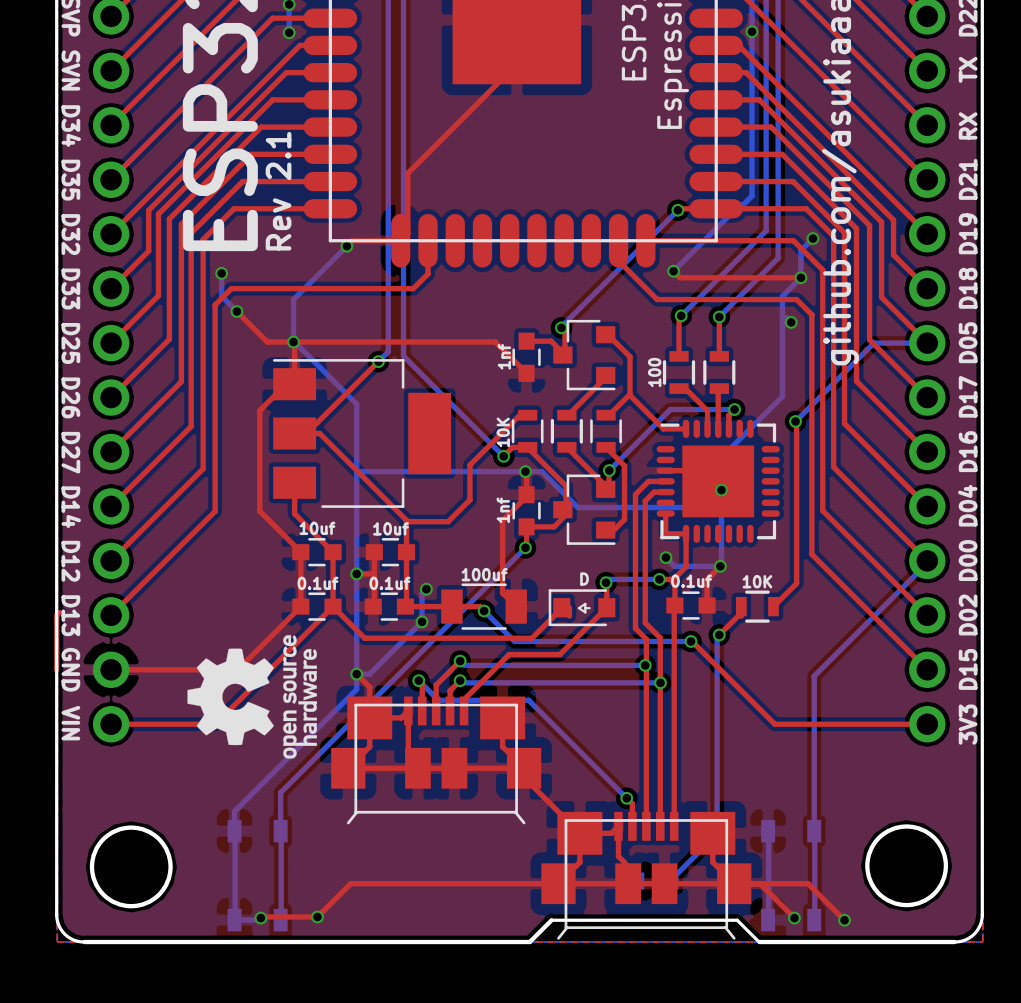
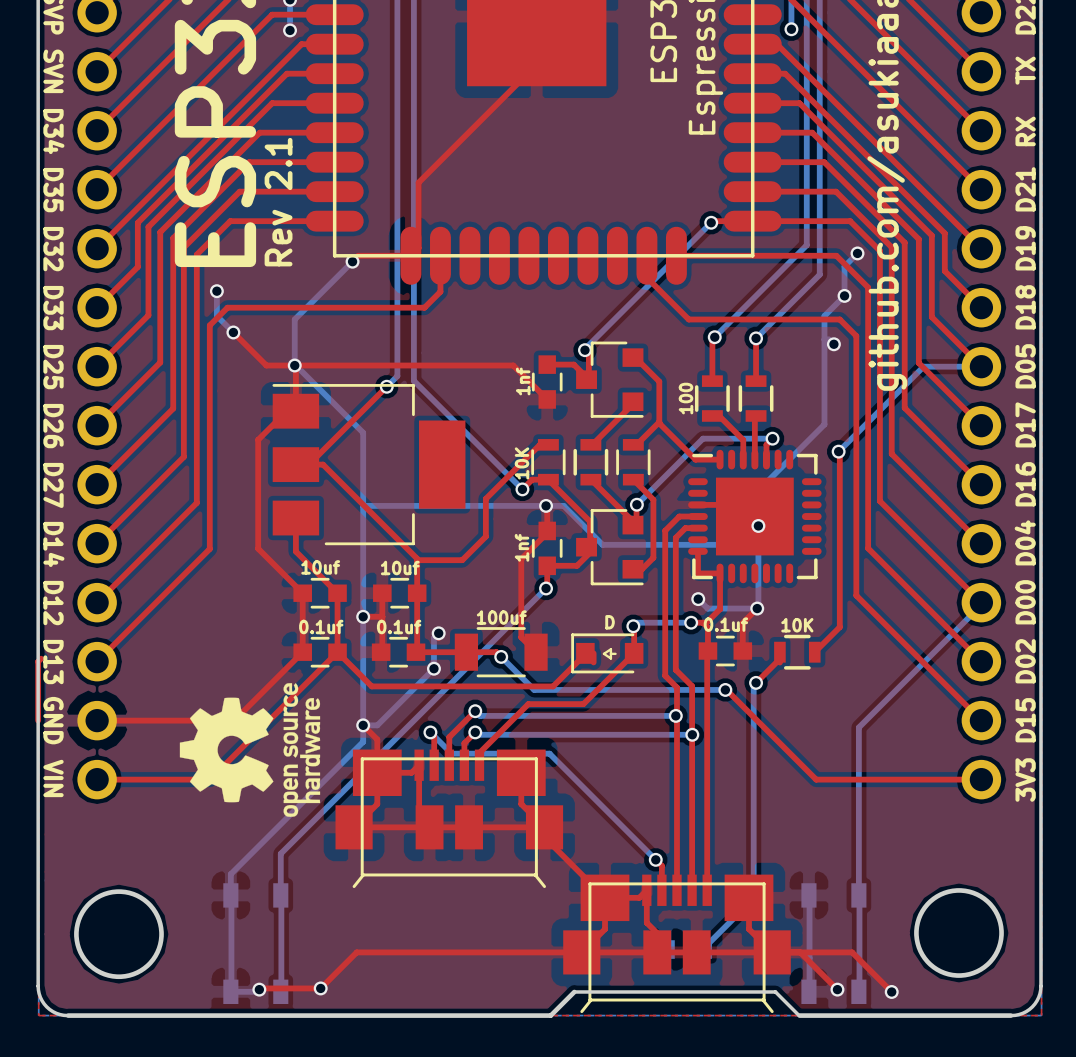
bottom track: (751, 31) (751, 196) (740, 208) (740, 204) (673, 271) -> none
top track: (673, 271) (680, 277) (800, 277) -> none
via: (673, 271) -> none

